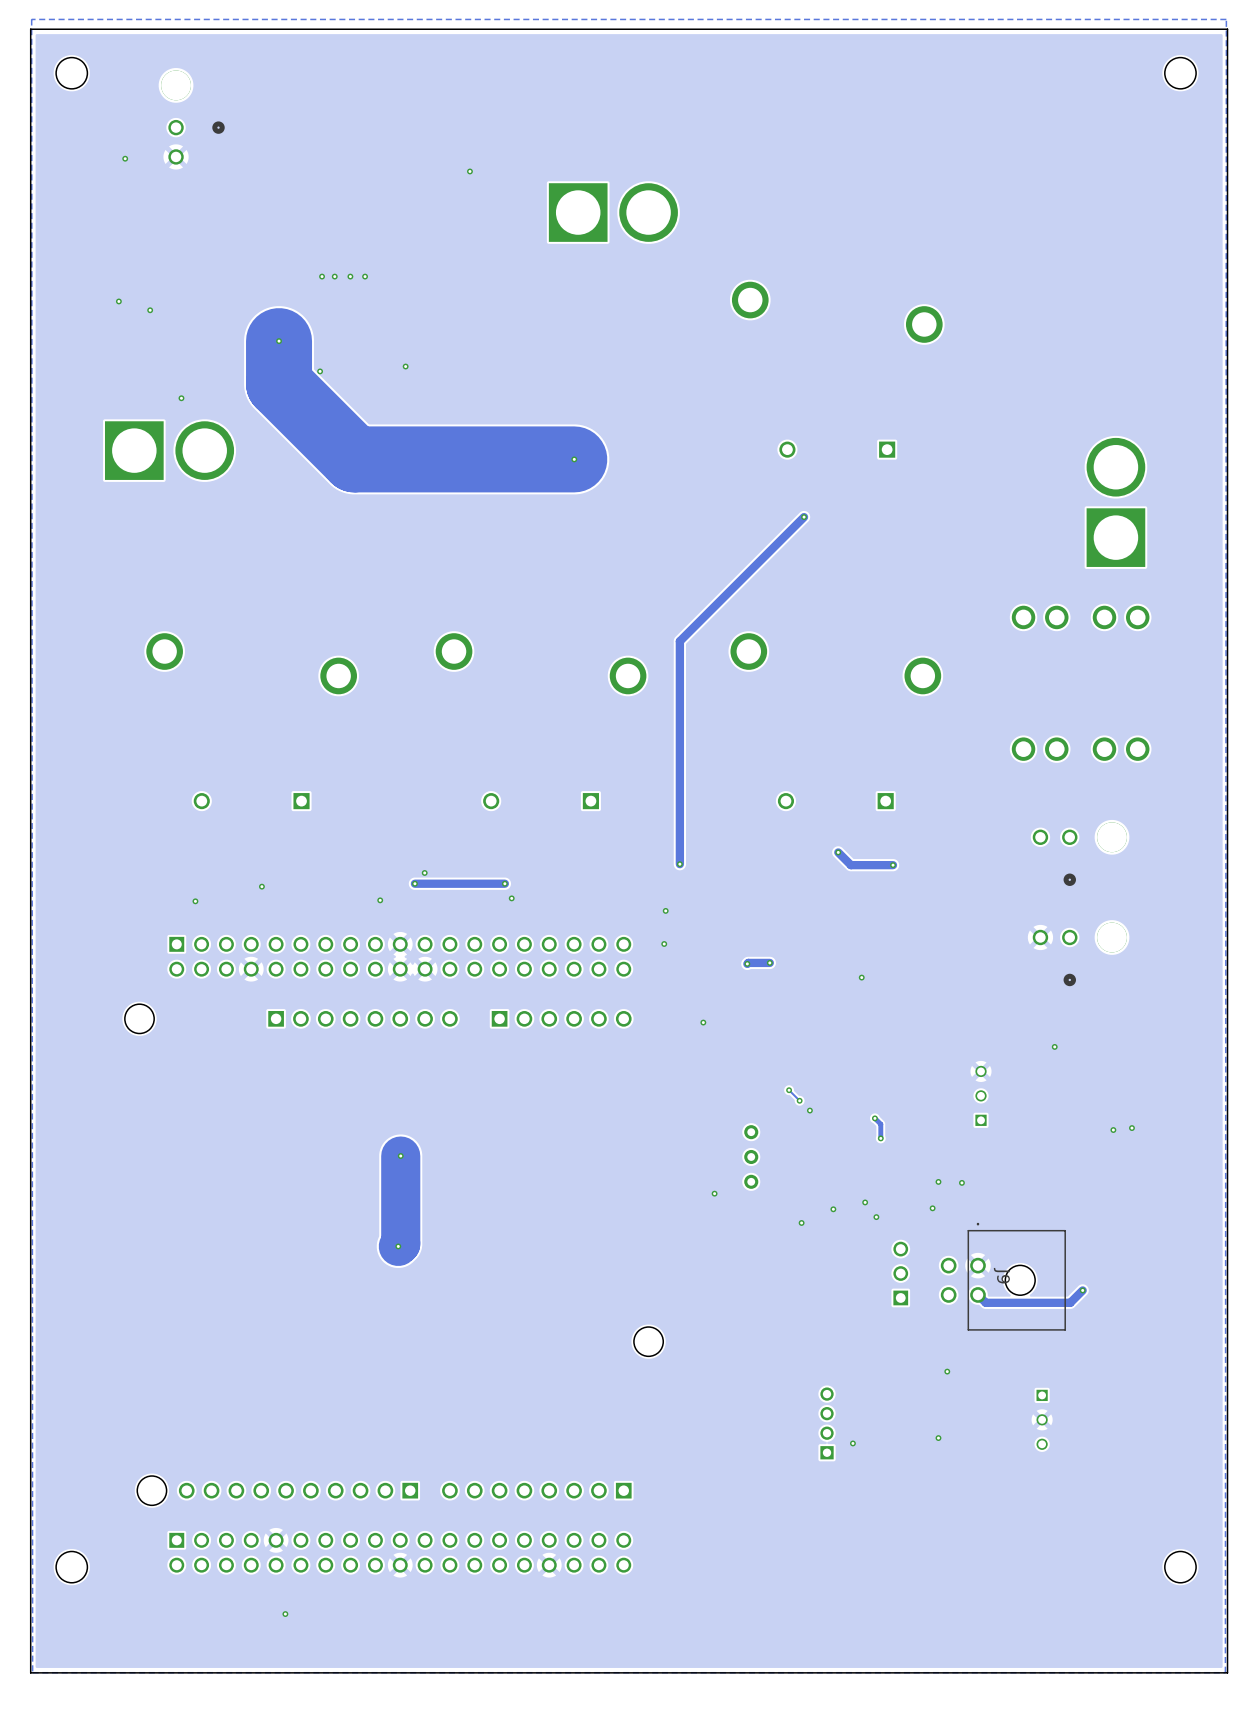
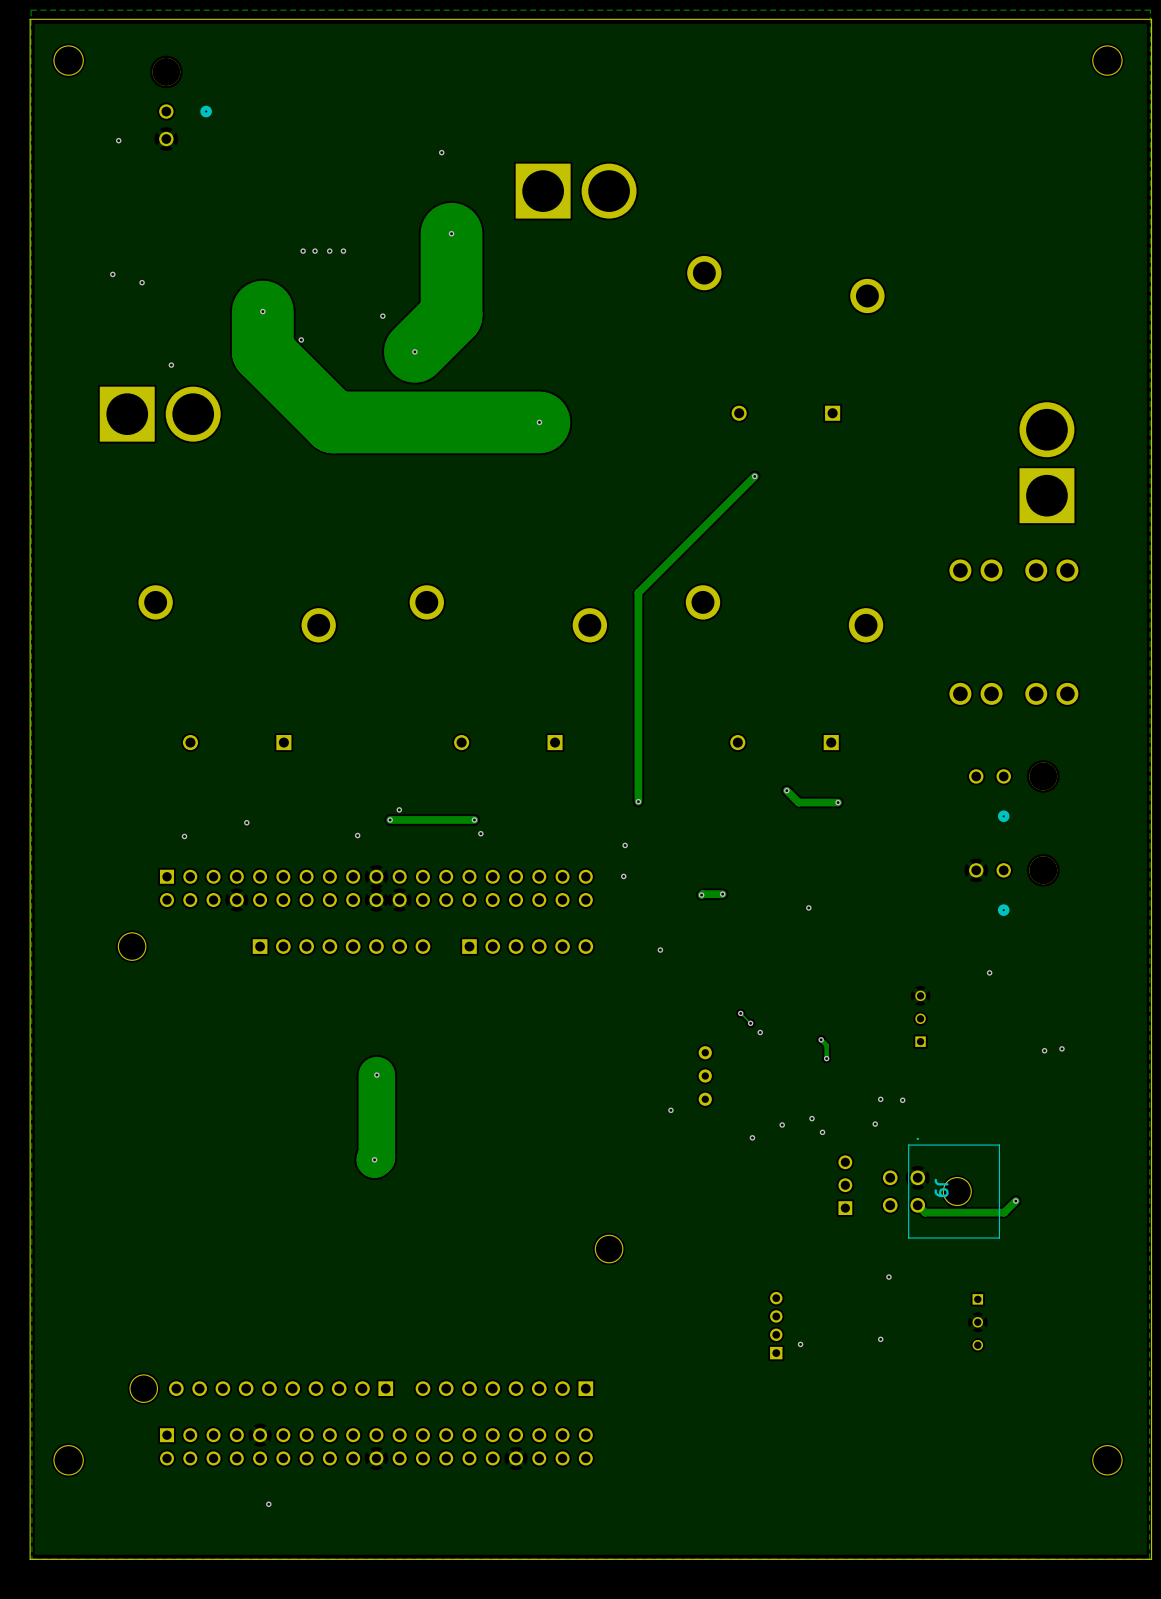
track: none -> (451, 233) (451, 315) (414, 351)
via: none -> (451, 233)
via: none -> (382, 316)
via: (405, 366) -> none
via: none -> (414, 351)

